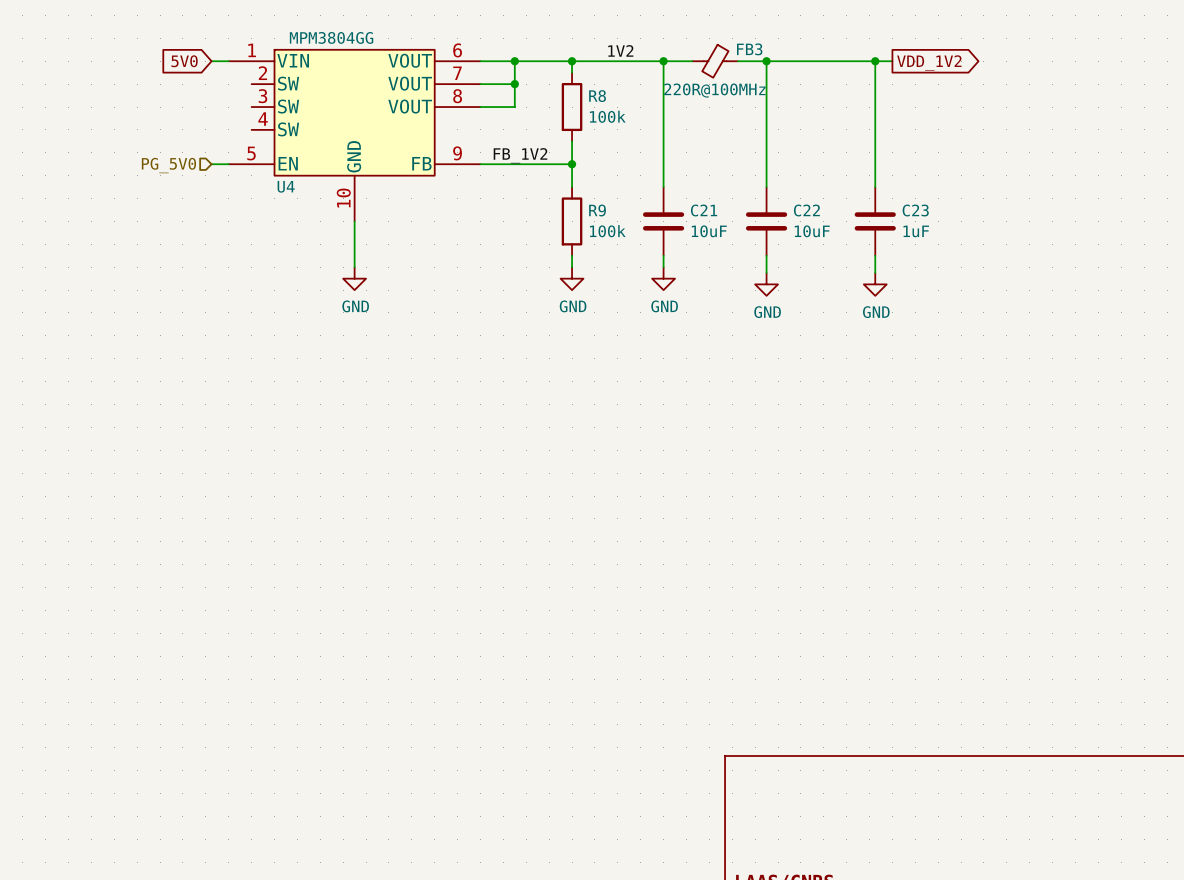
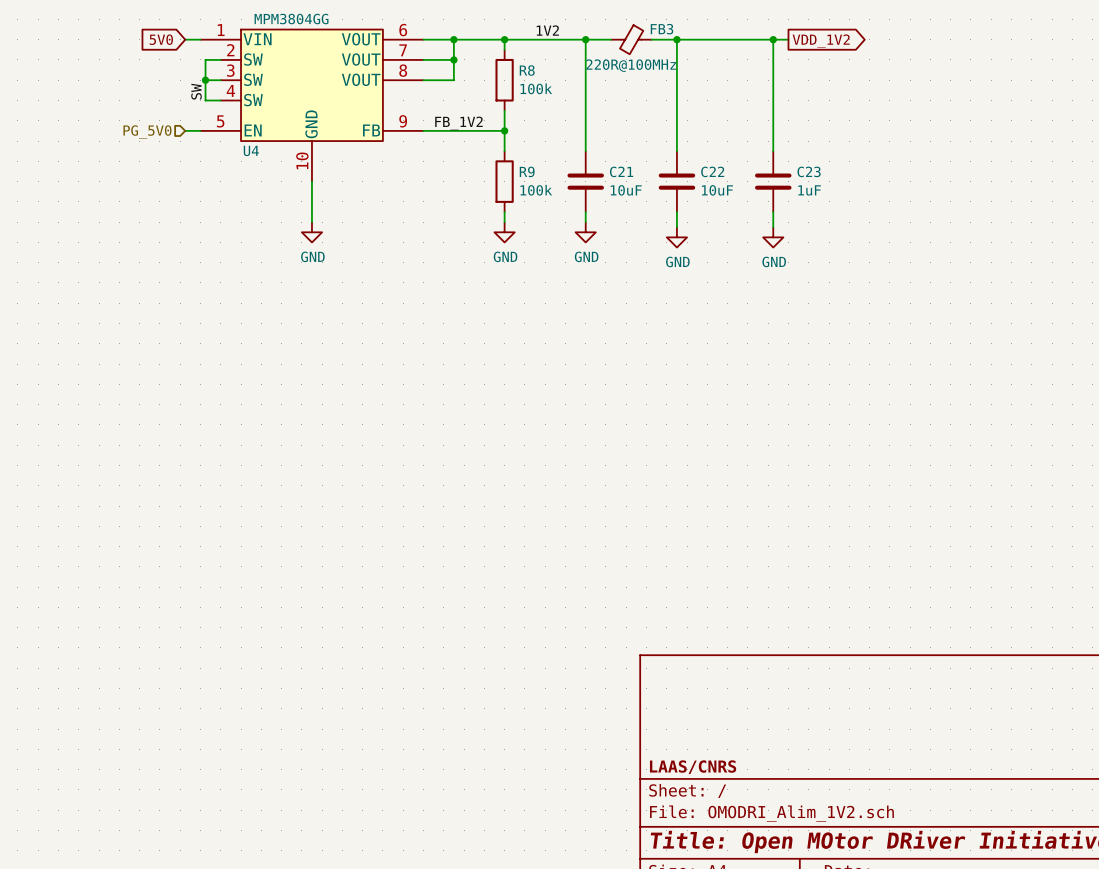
wire: none -> (220, 59) (205, 59) (205, 100) (220, 100)
wire: none -> (205, 80) (220, 80)
junction: none -> (205, 80)
label: none -> SW (196, 91)

